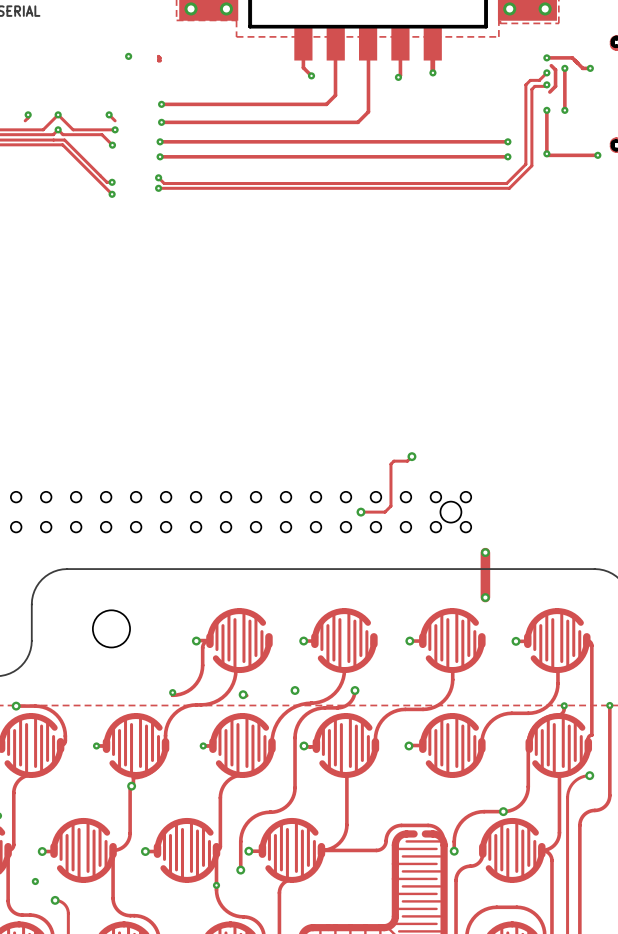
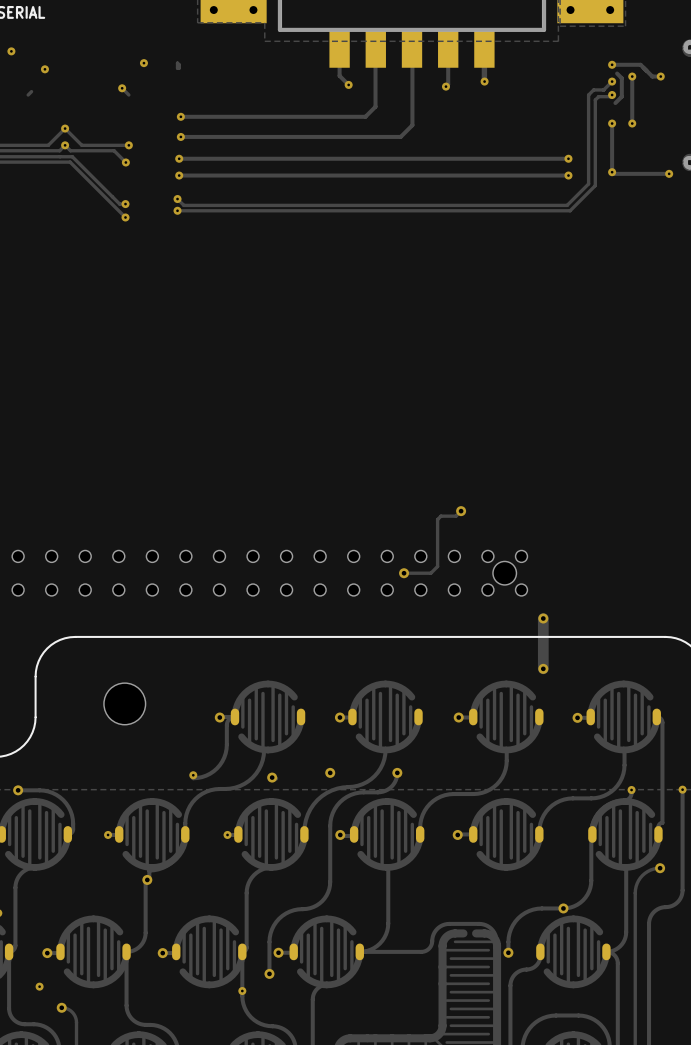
via: none -> (11, 51)
via: none -> (44, 69)
track: none -> (31, 91) (28, 95)
track: (28, 114) (25, 120) -> none
via: (28, 114) -> none
track: (109, 114) (115, 120) -> (122, 88) (128, 95)
via position: (109, 114) -> (122, 88)

